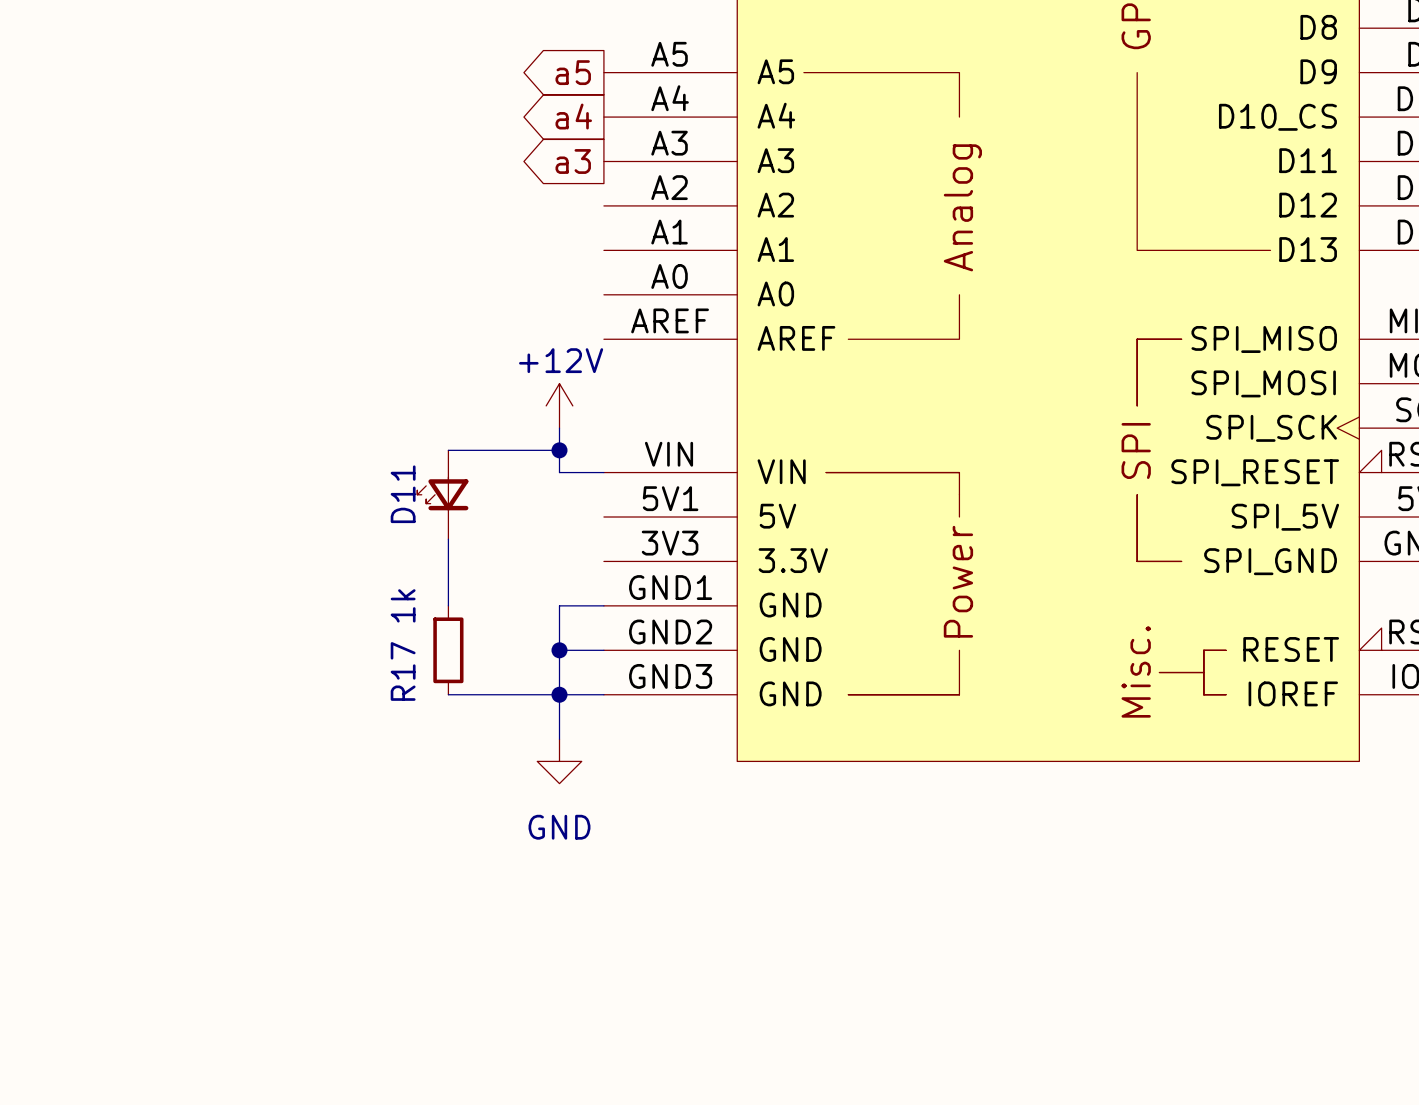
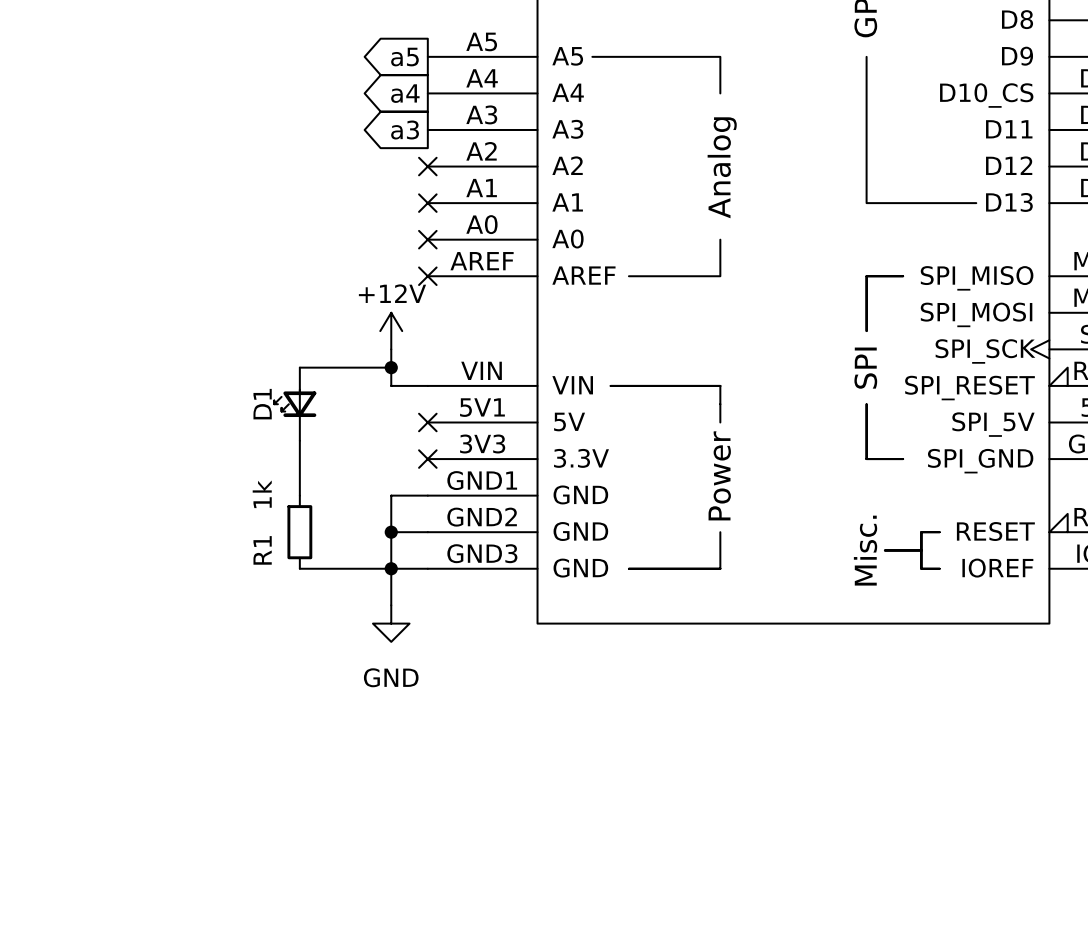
no-connect mark: none -> (427, 166)
no-connect mark: none -> (427, 203)
no-connect mark: none -> (427, 239)
no-connect mark: none -> (427, 276)
D11 name: D11 (403, 494) -> D1 (262, 404)
no-connect mark: none -> (427, 422)
no-connect mark: none -> (427, 459)
R17 name: R17 (403, 671) -> R1 (262, 550)

